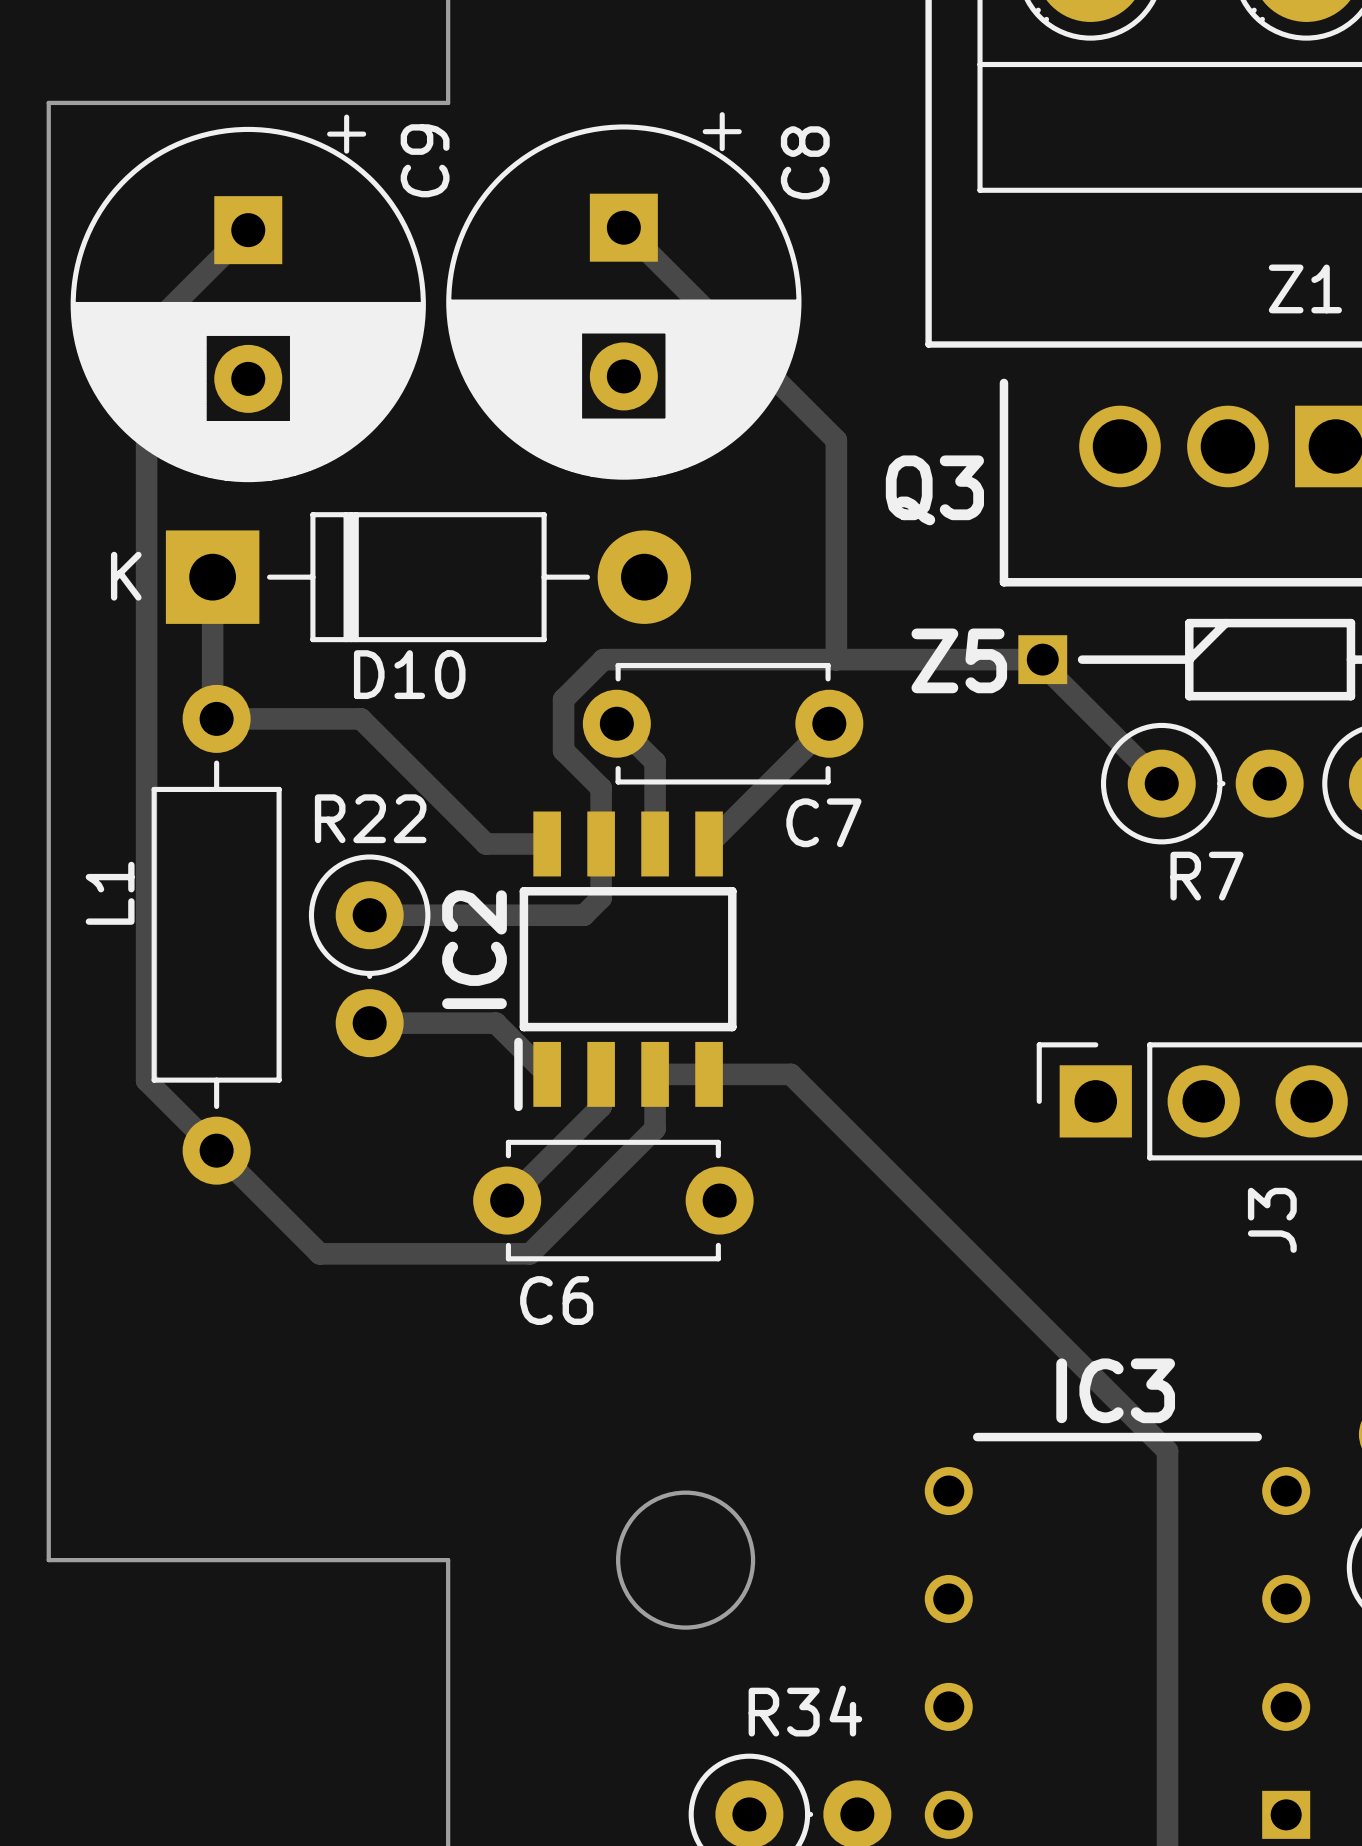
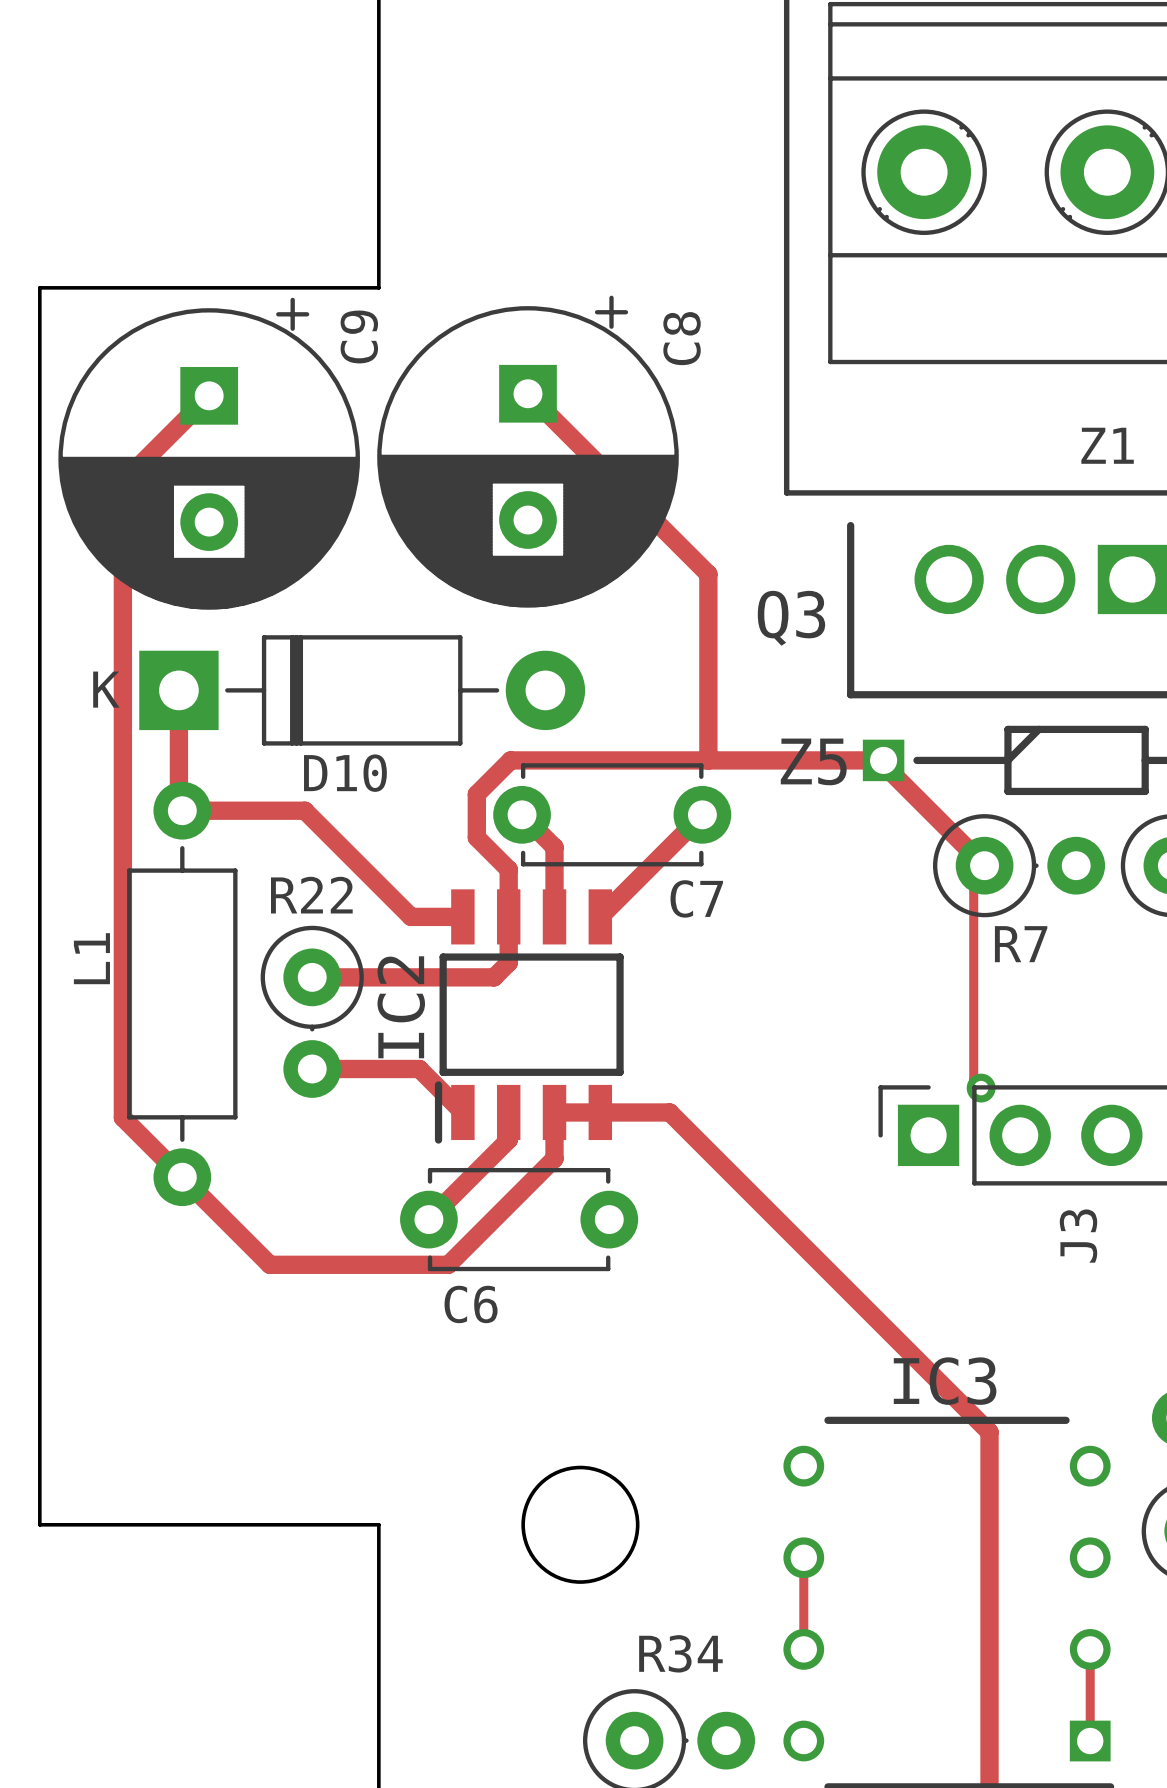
track: none -> (973, 854) (973, 1080) (981, 1088)
via: none -> (981, 1088)
track: none -> (803, 1557) (803, 1649)
track: none -> (1090, 1649) (1090, 1741)

